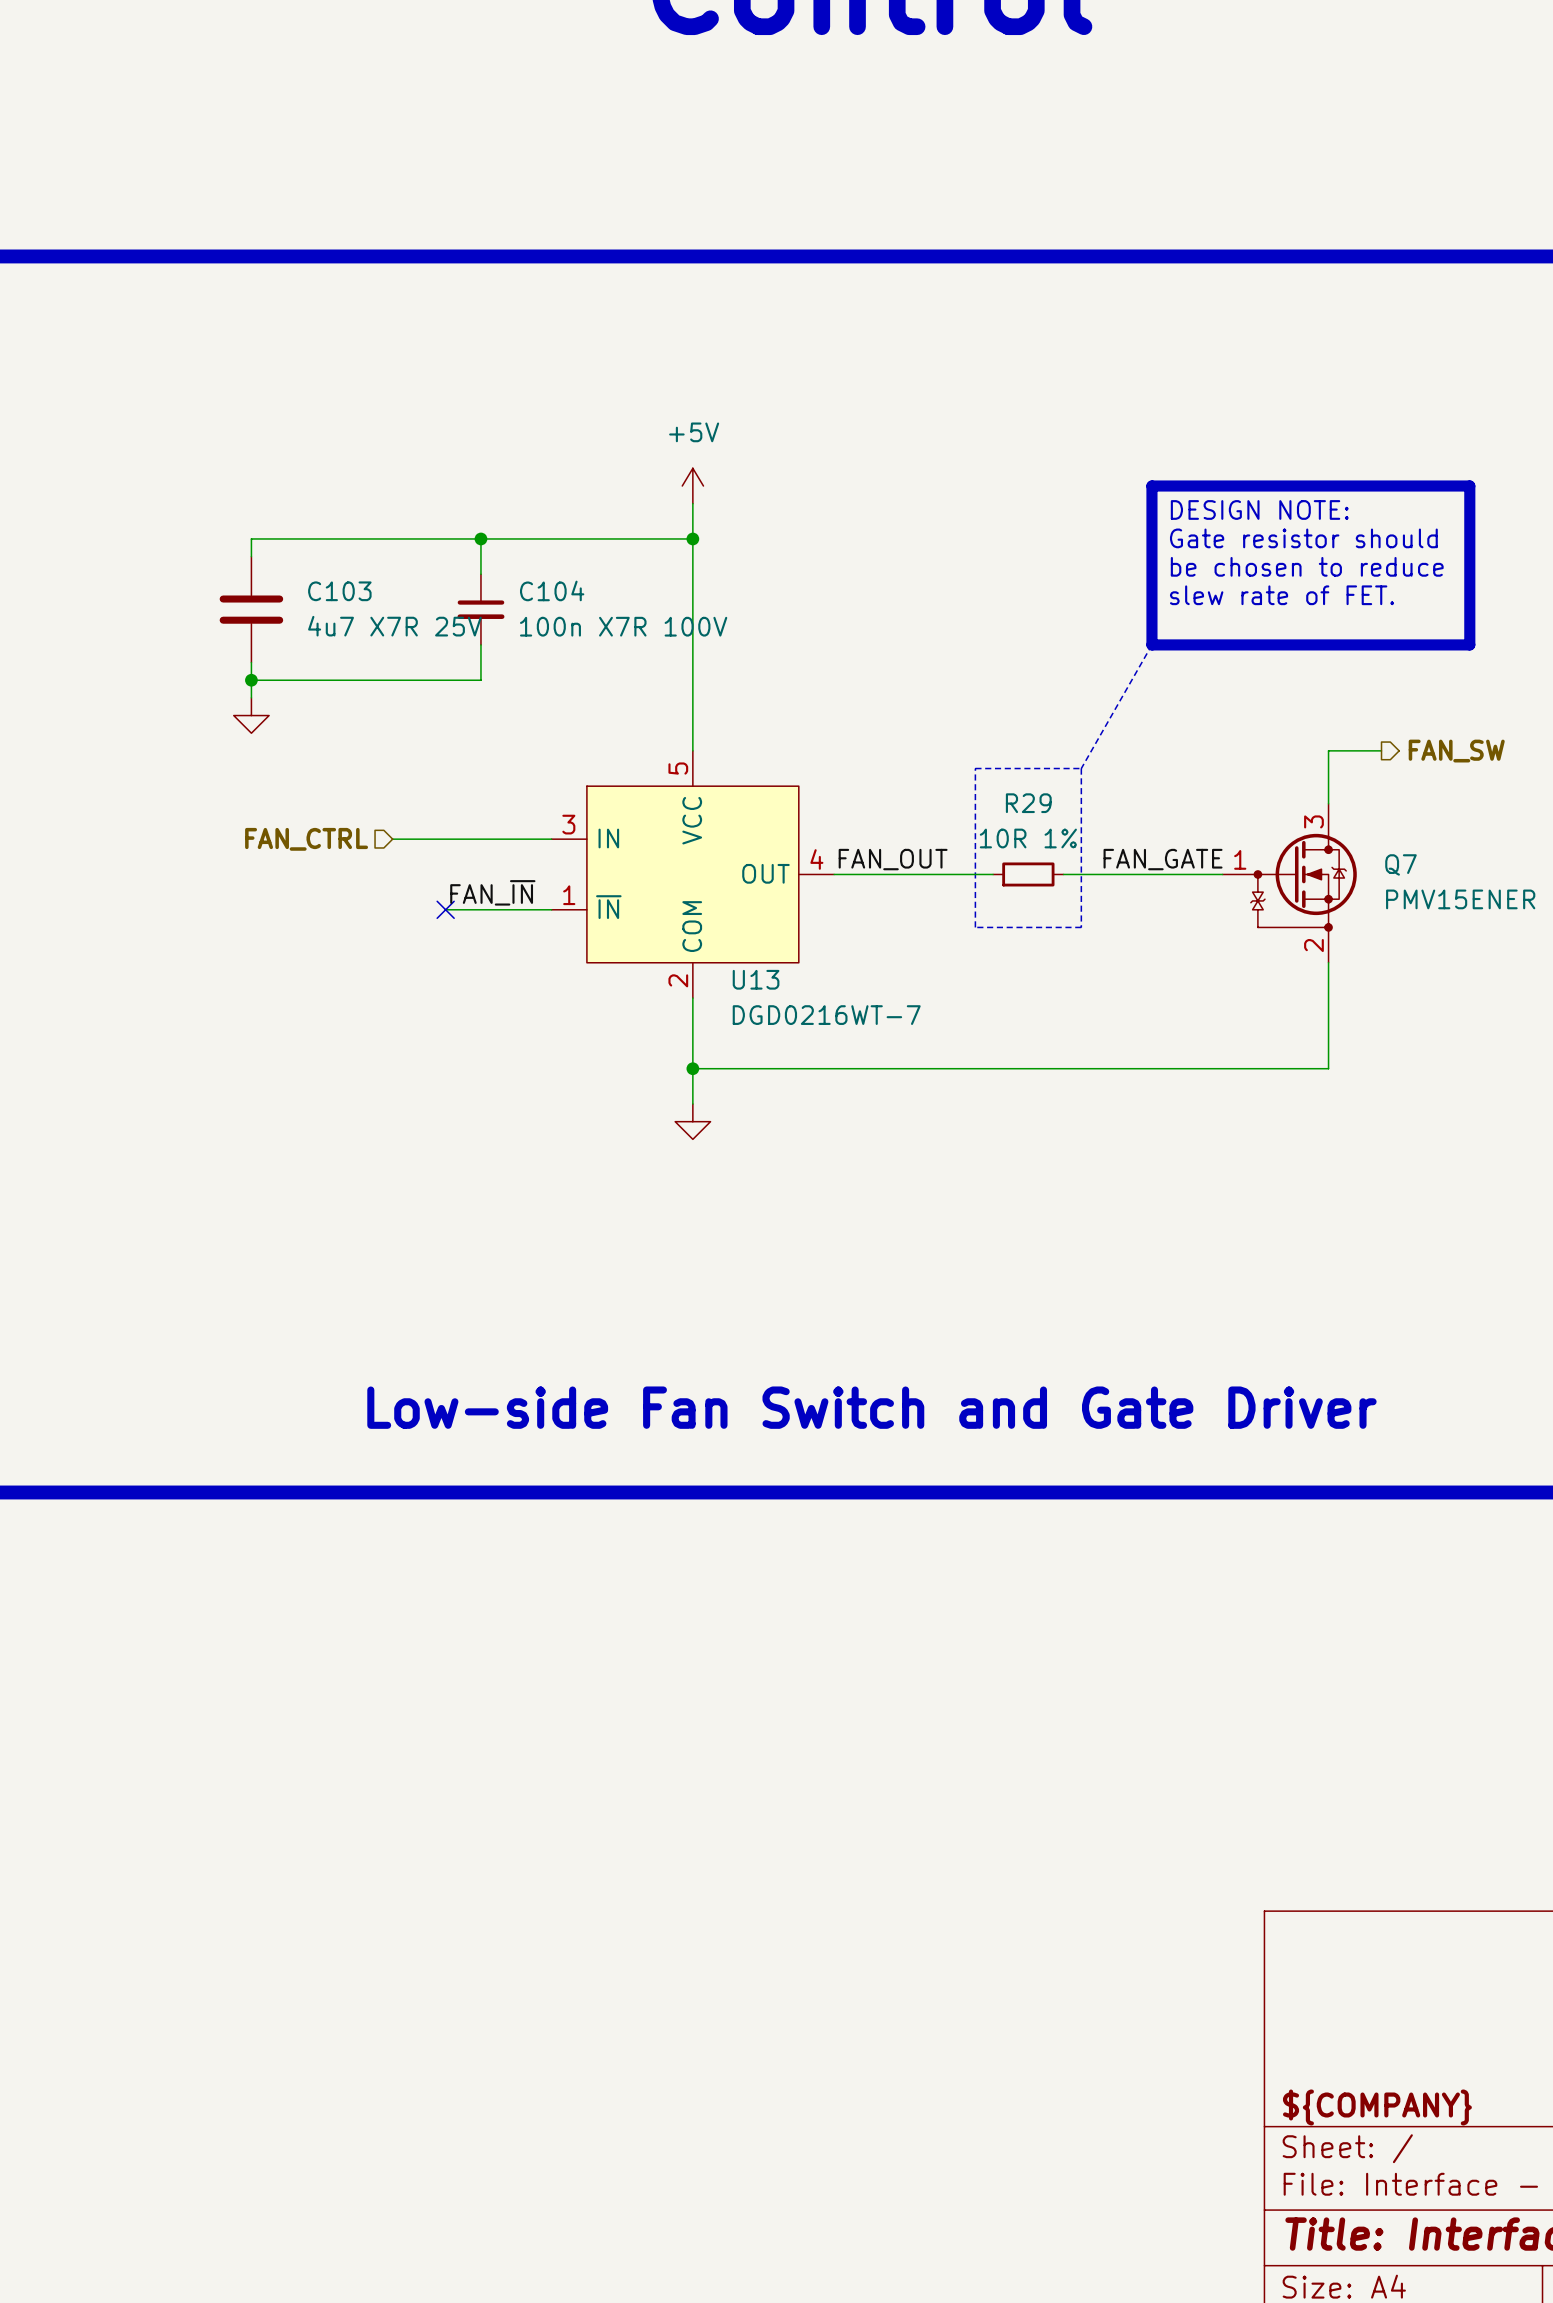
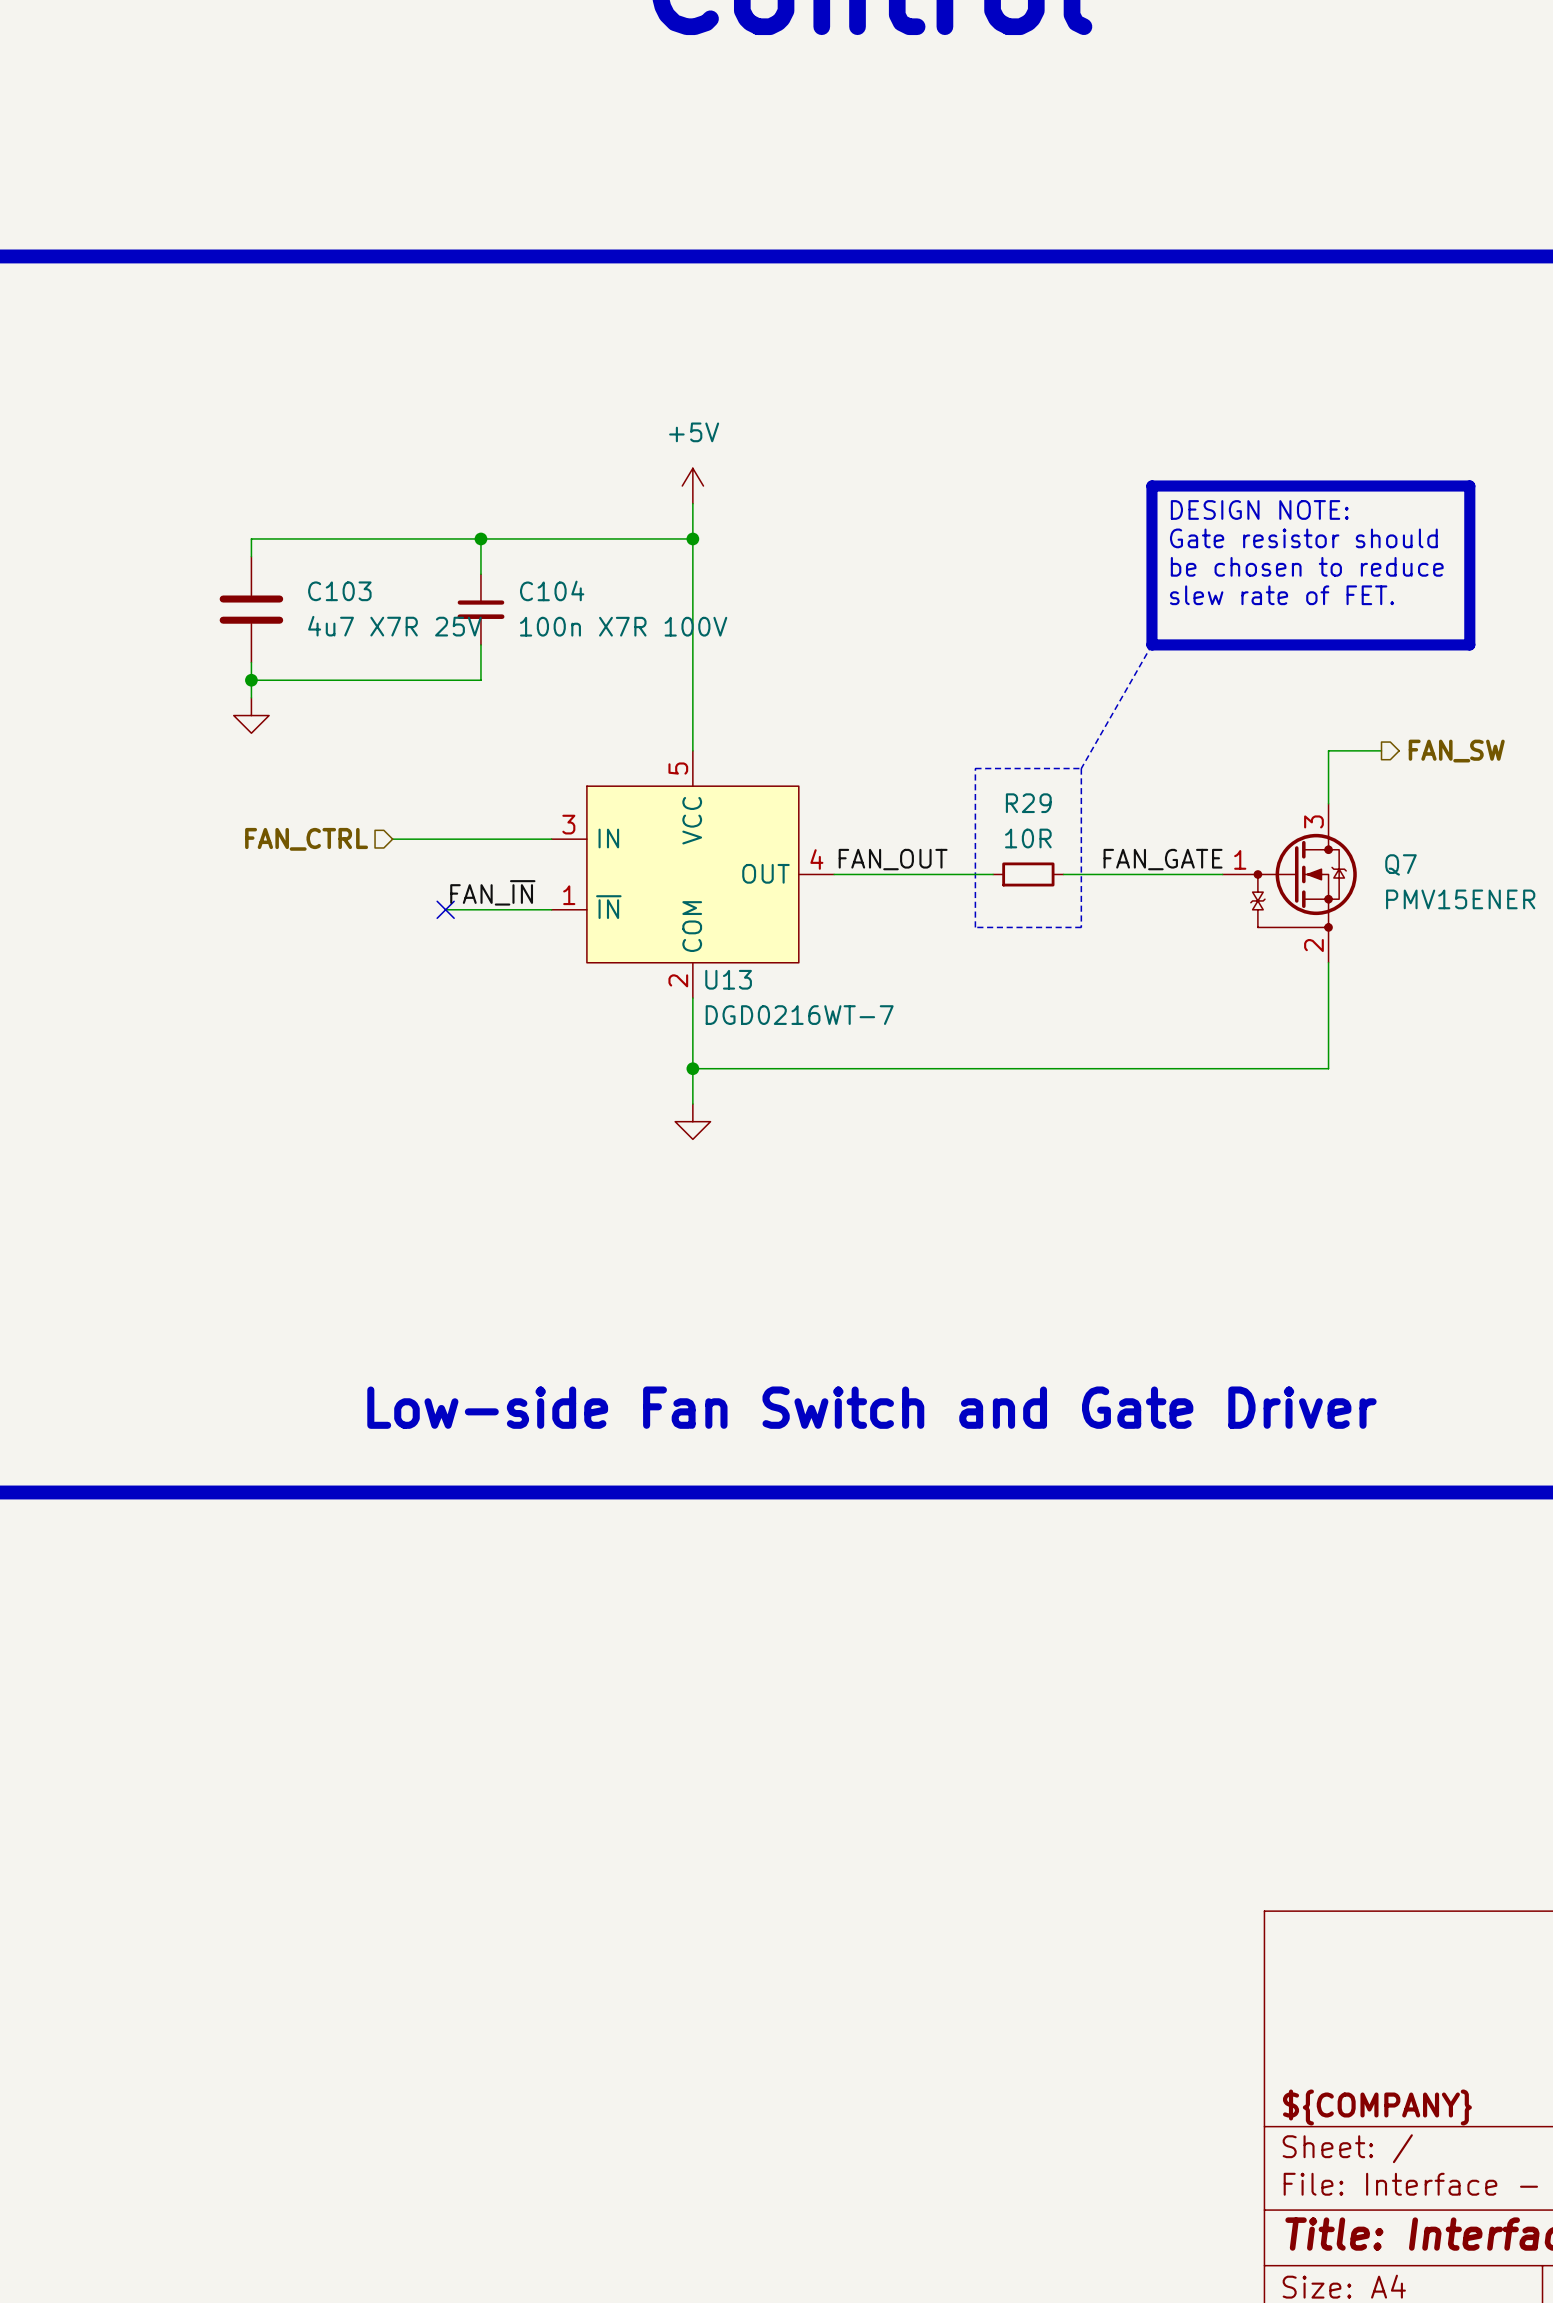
R29 value: 10R 1% (1028, 838) -> 10R (1028, 838)
U13 name position: U13 (756, 979) -> U13 (728, 979)
U13 value position: DGD0216WT-7 (826, 1015) -> DGD0216WT-7 (799, 1015)

